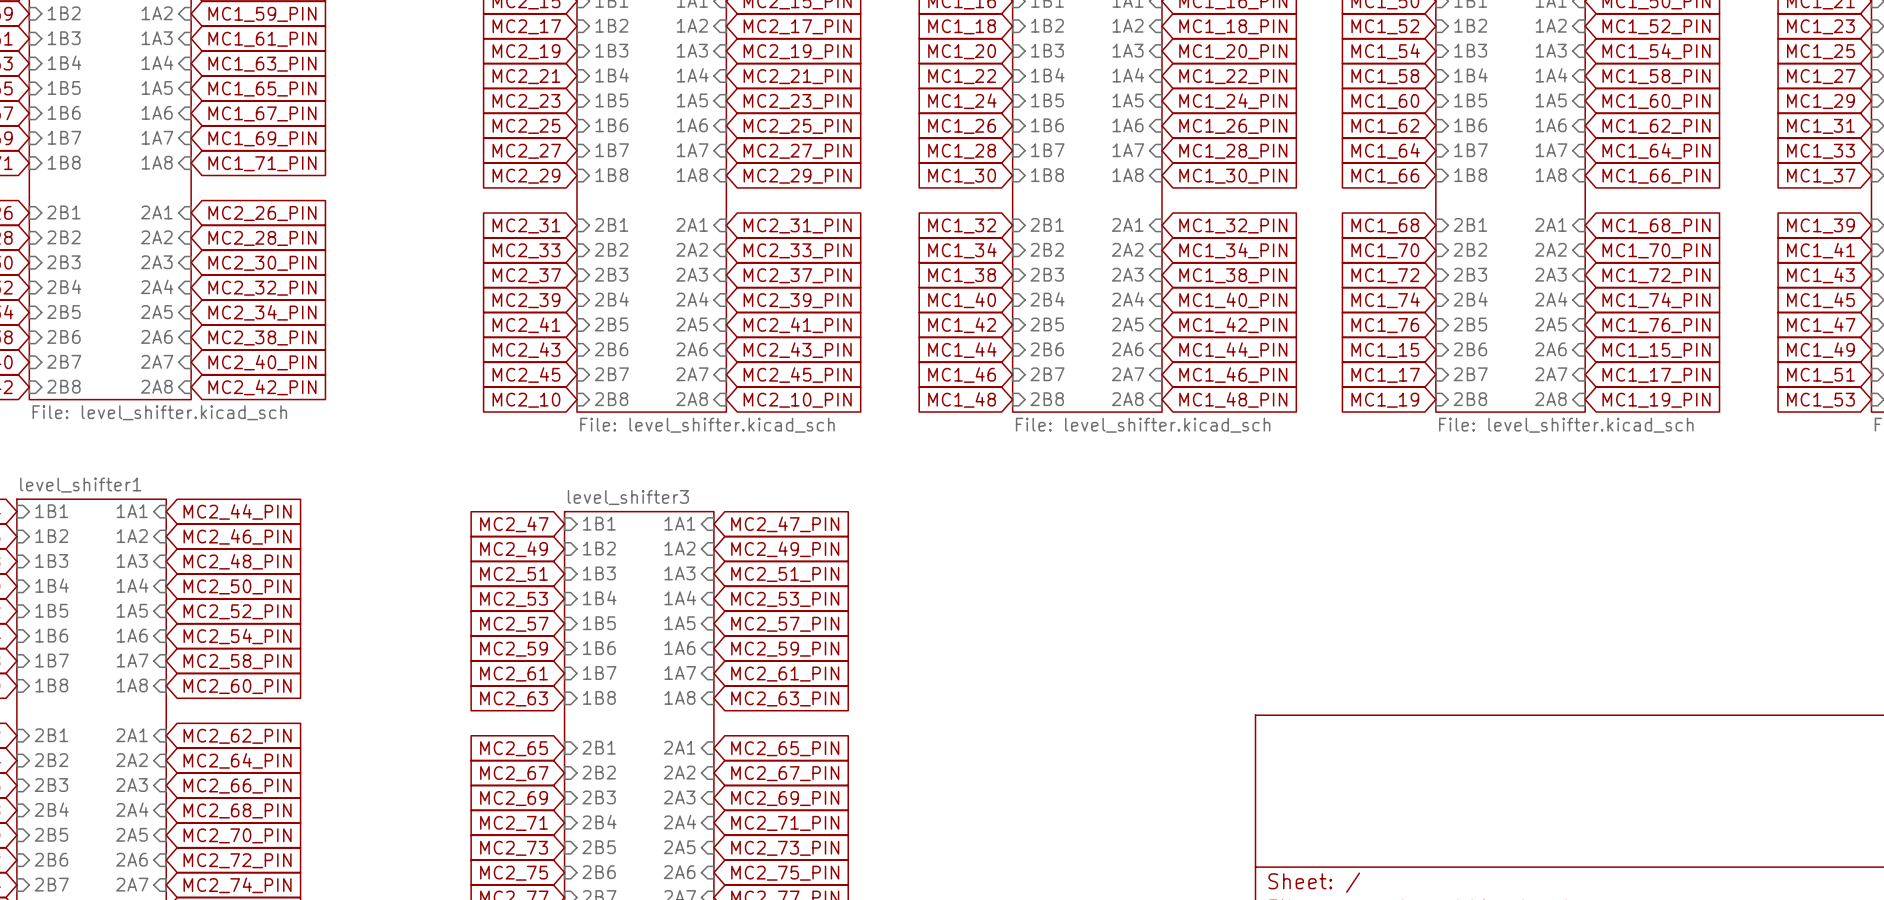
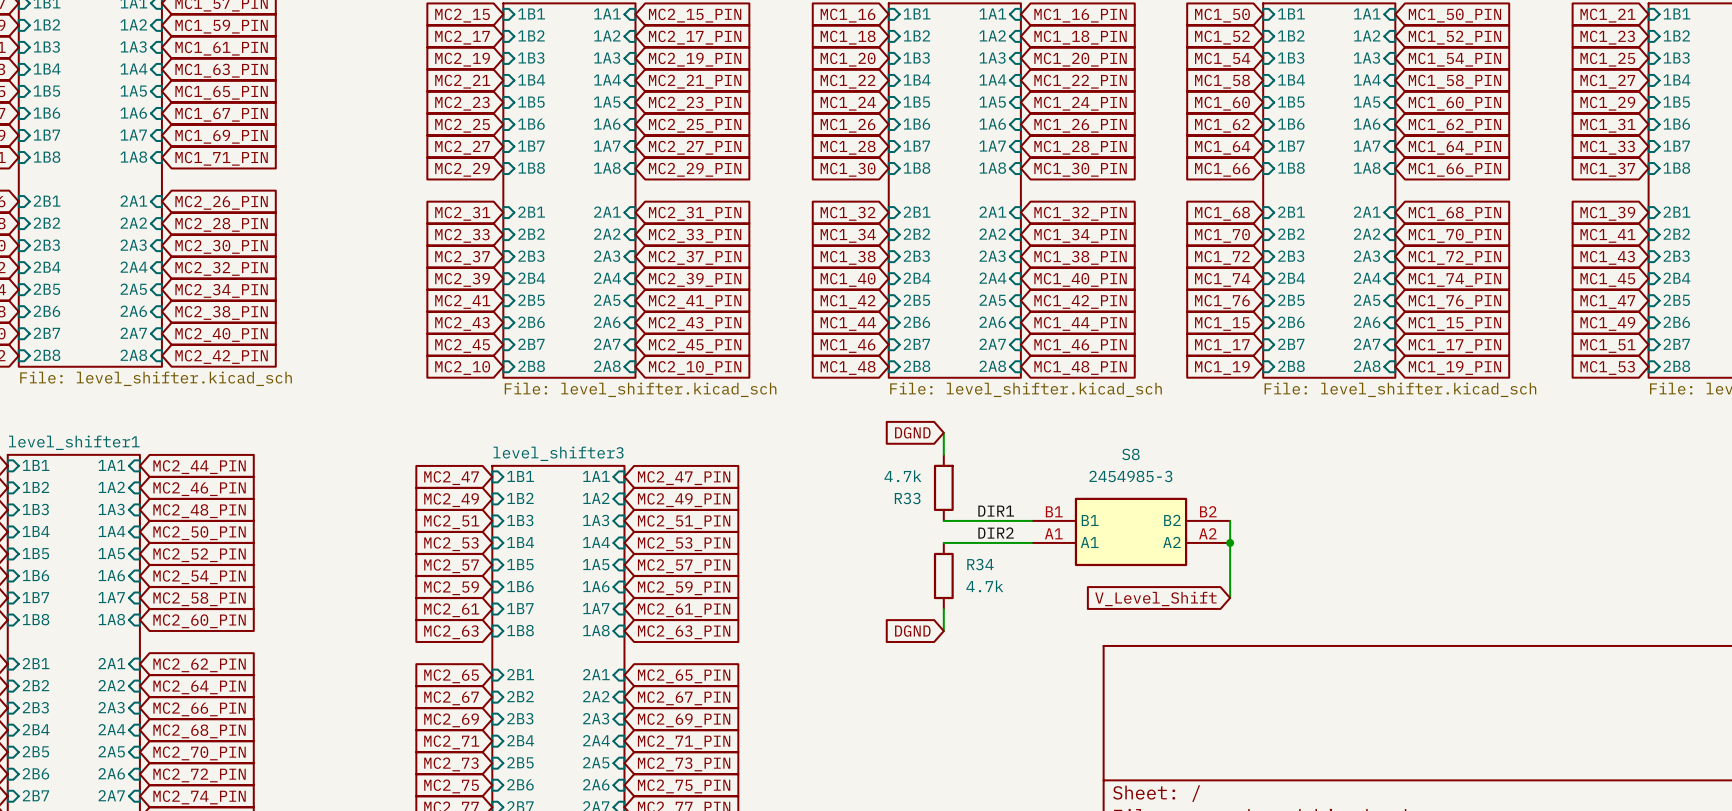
global label: none -> DGND (912, 432)
wire: none -> (943, 432) (943, 454)
R33: none -> 4.7k (943, 487)
label: none -> DIR1 (996, 511)
wire: none -> (943, 520) (1031, 520)
wire: none -> (1230, 520) (1230, 598)
S8: none -> 2454985-3 (1131, 531)
label: none -> DIR2 (996, 533)
wire: none -> (943, 542) (1031, 542)
junction: none -> (1230, 542)
R34: none -> 4.7k (943, 575)
global label: none -> V_Level_Shift (1155, 598)
wire: none -> (943, 609) (943, 631)
global label: none -> DGND (912, 631)

